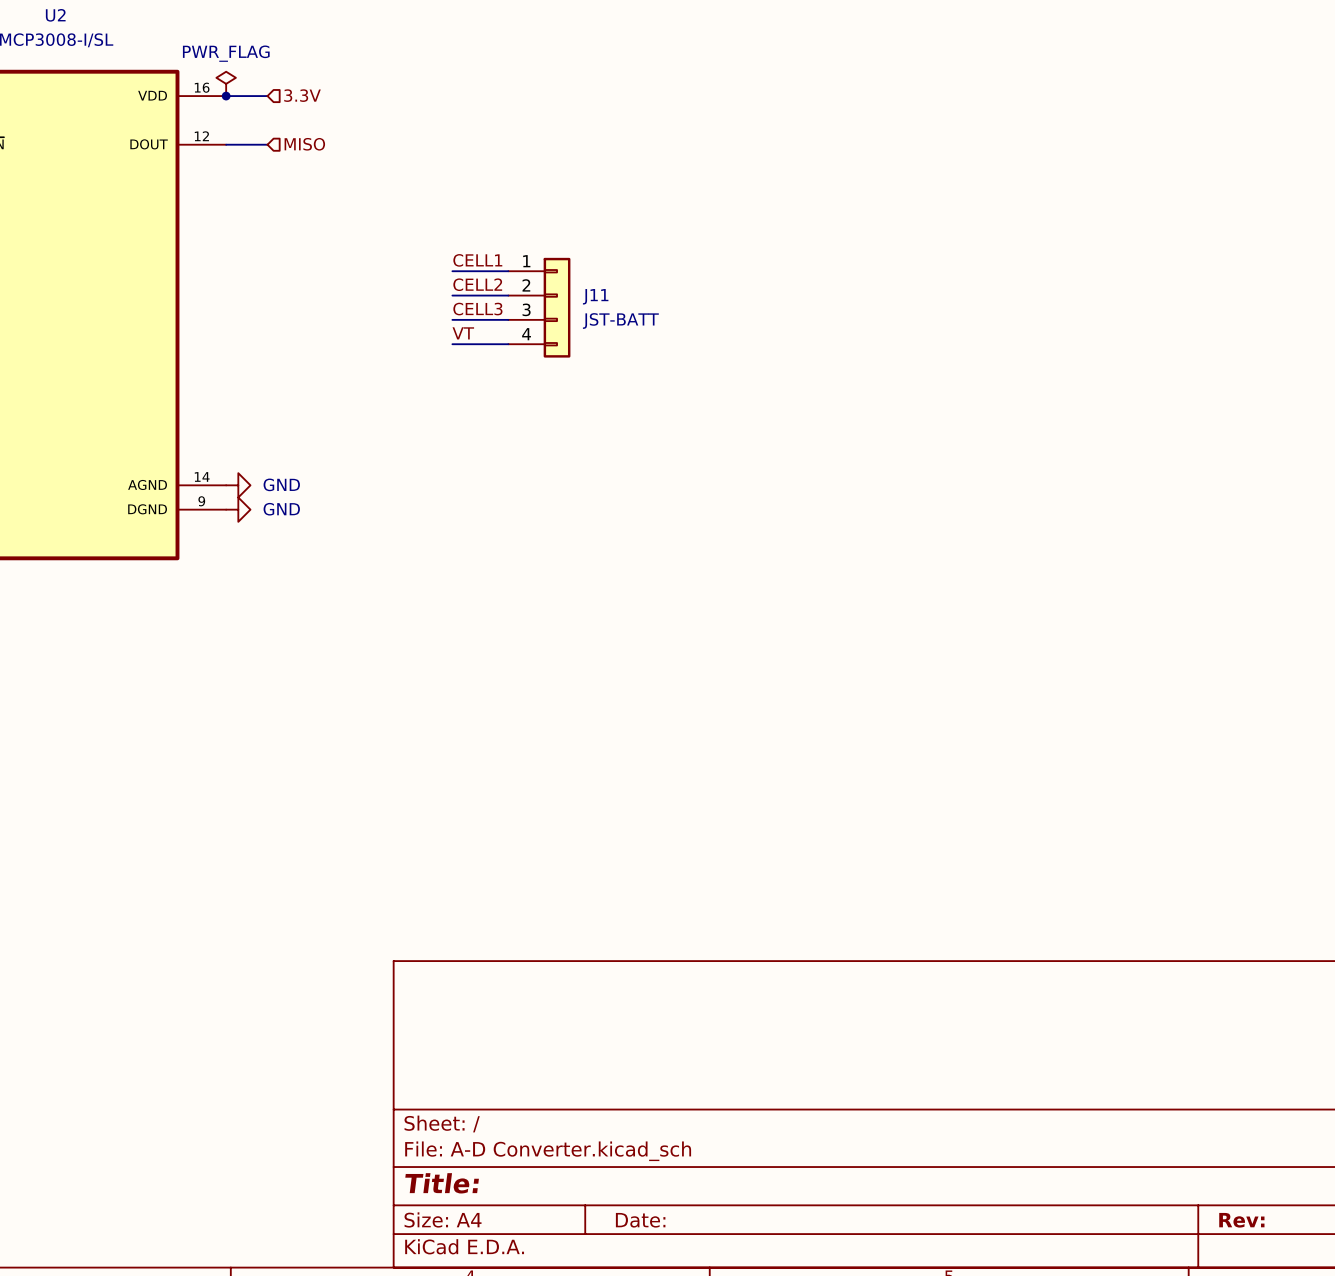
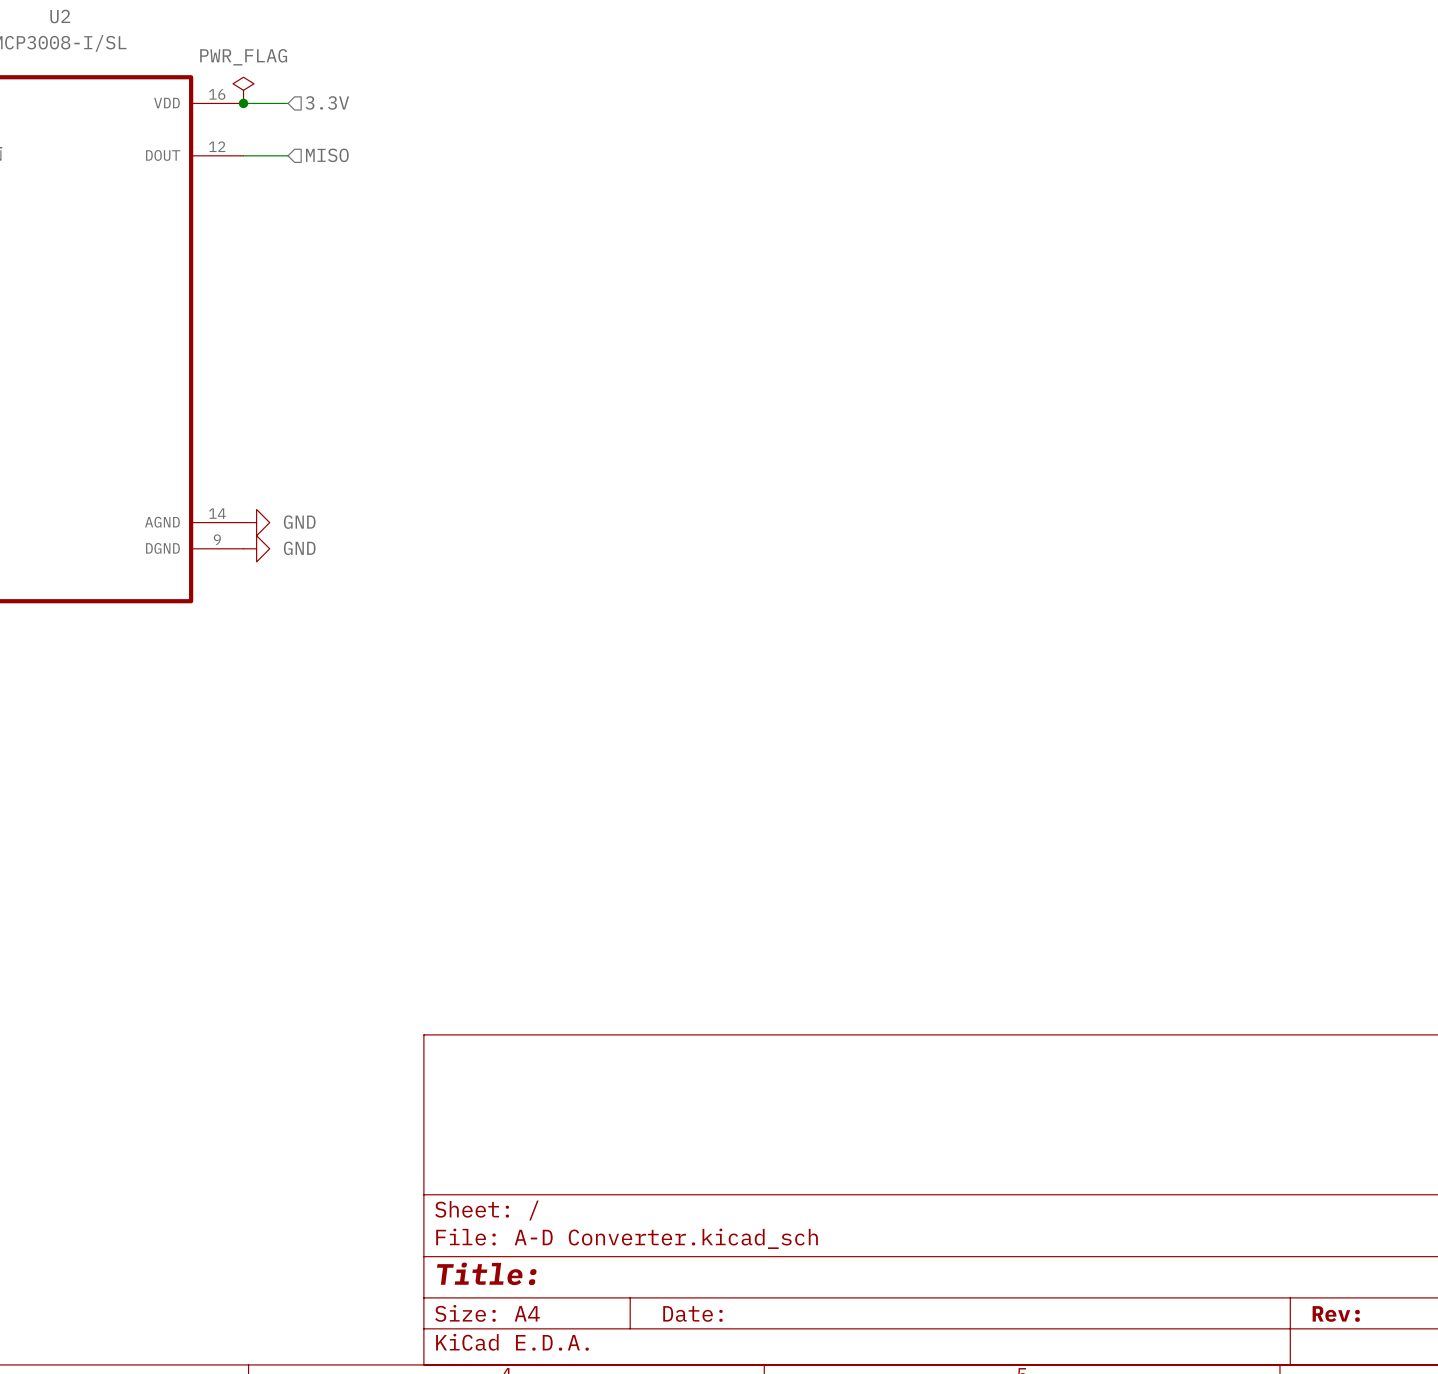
label: CELL1 (477, 260) -> none
wire: (452, 271) (508, 271) -> none
label: CELL2 (477, 284) -> none
wire: (452, 295) (508, 295) -> none
J11: JST-BATT (539, 307) -> none
label: CELL3 (477, 309) -> none
wire: (452, 319) (508, 319) -> none
label: VT (463, 333) -> none
wire: (452, 344) (508, 344) -> none

